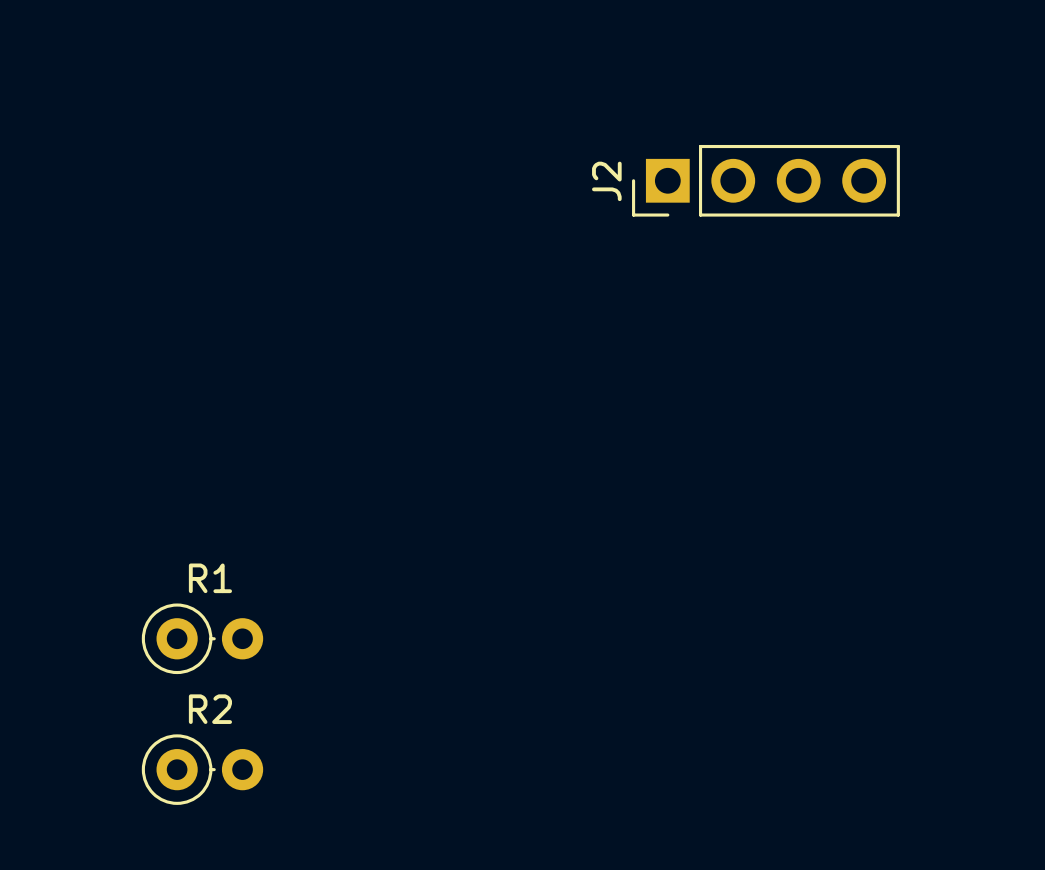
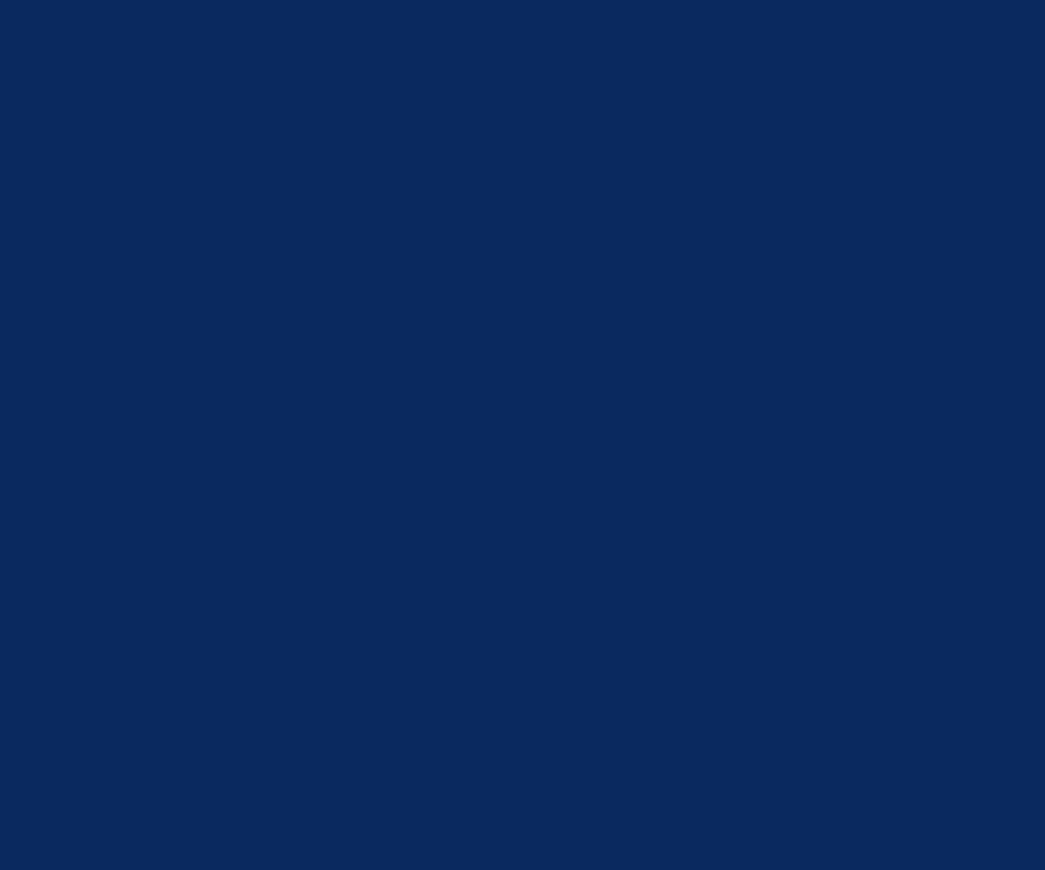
J2: (765, 180) -> none
R1: (202, 638) -> none
R2: (202, 769) -> none

